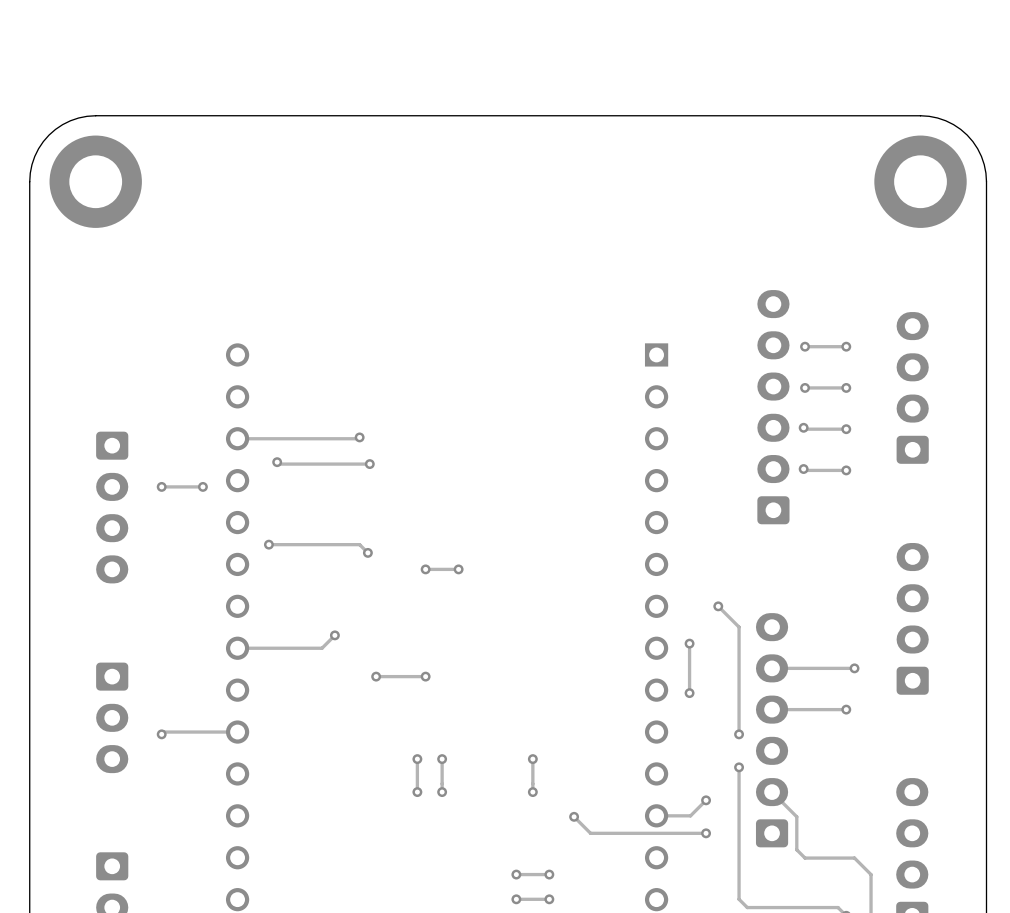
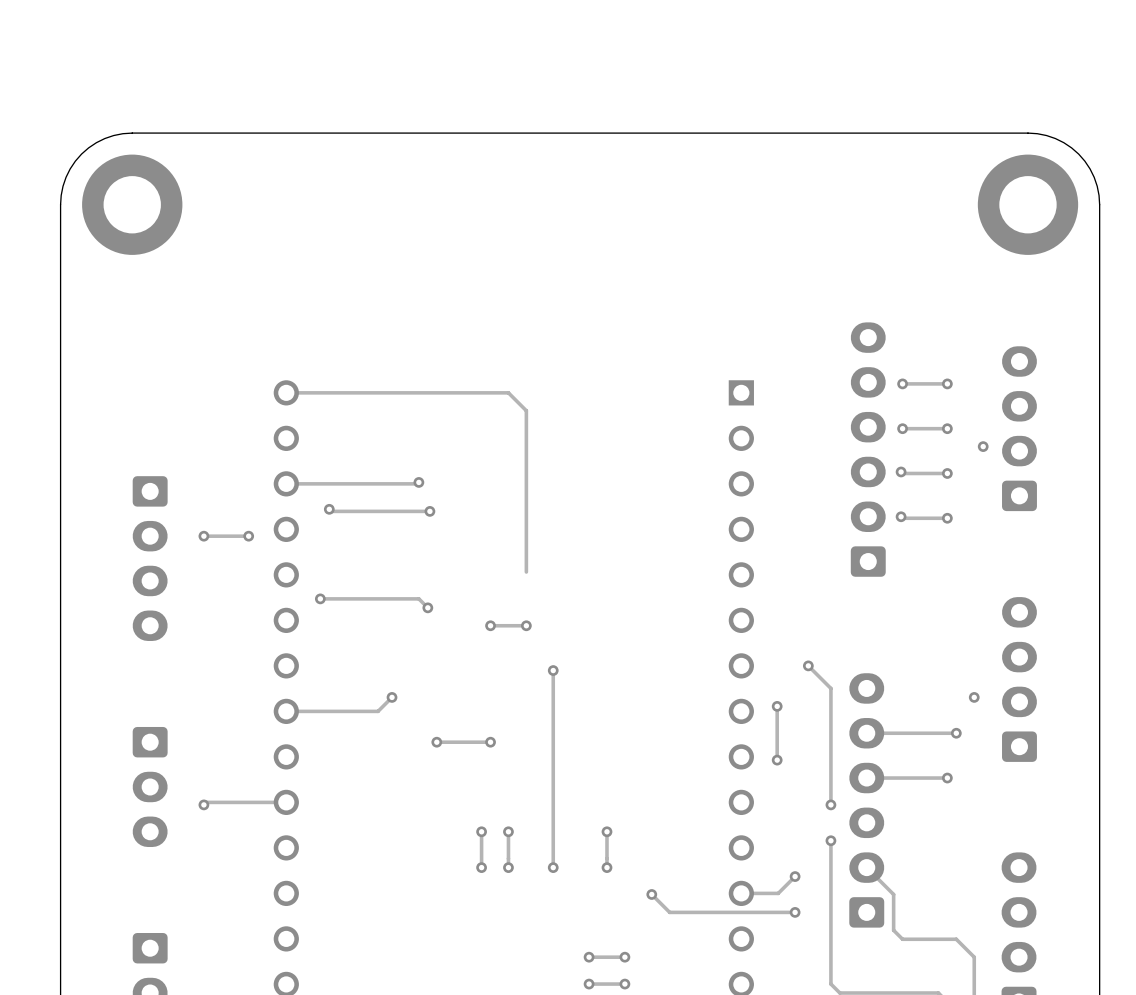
track: none -> (286, 392) (508, 392) (526, 410) (526, 572)
via: none -> (983, 446)
track: none -> (553, 670) (553, 867)
via: none -> (553, 670)
via: none -> (974, 697)
via: none -> (553, 867)

